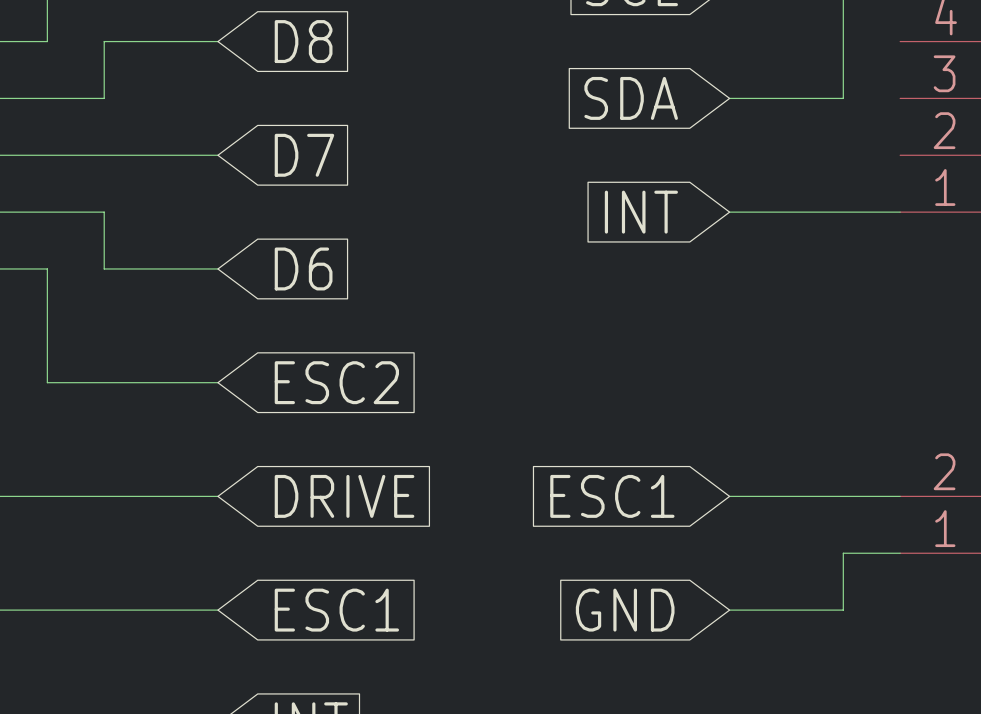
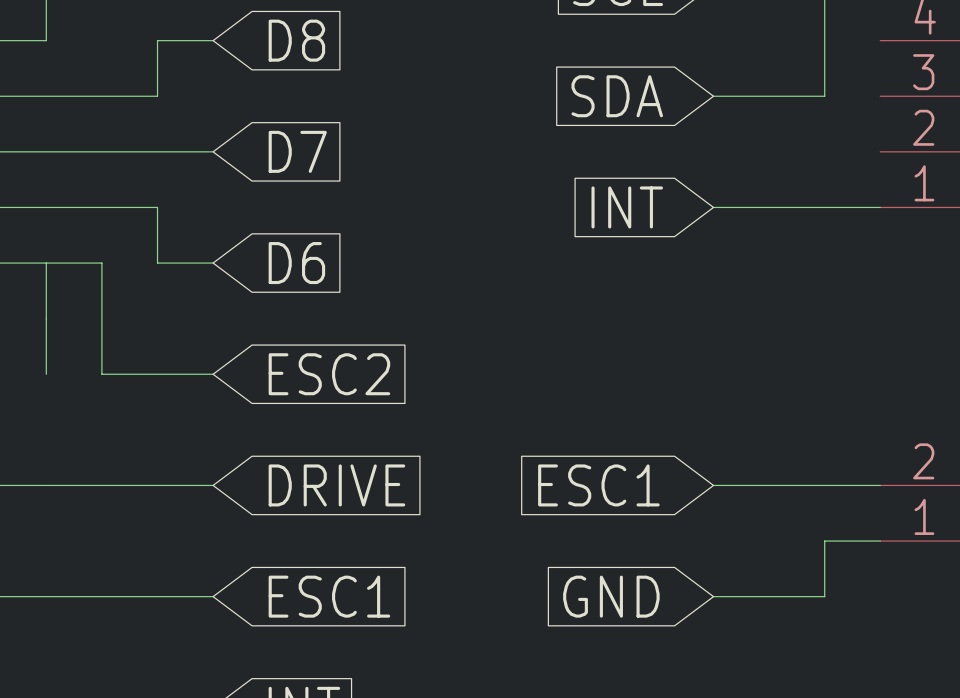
wire: (161, 41) (104, 41) (104, 98) -> (157, 40) (157, 96) (101, 96)
wire: (104, 212) (104, 268) (161, 268) -> (101, 207) (157, 207) (157, 263)
wire: (47, 382) (104, 382) -> (46, 263) (101, 263) (101, 374)

